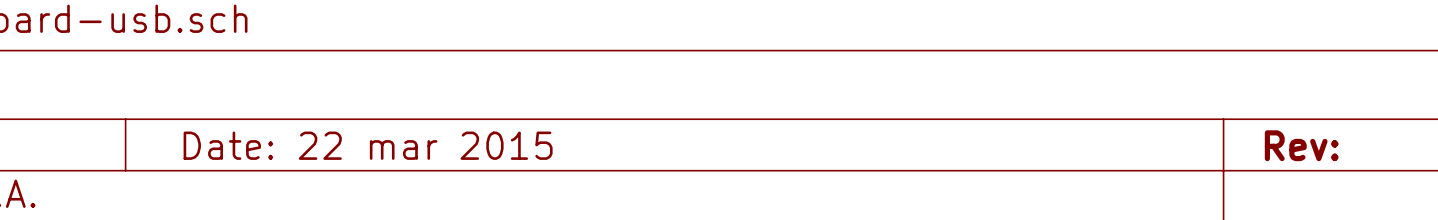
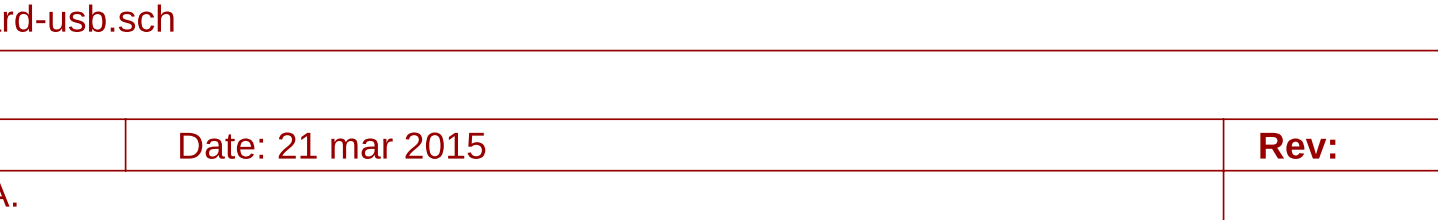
title block: Date: 22 mar 2015 (368, 145) -> Date: 21 mar 2015 (332, 145)

